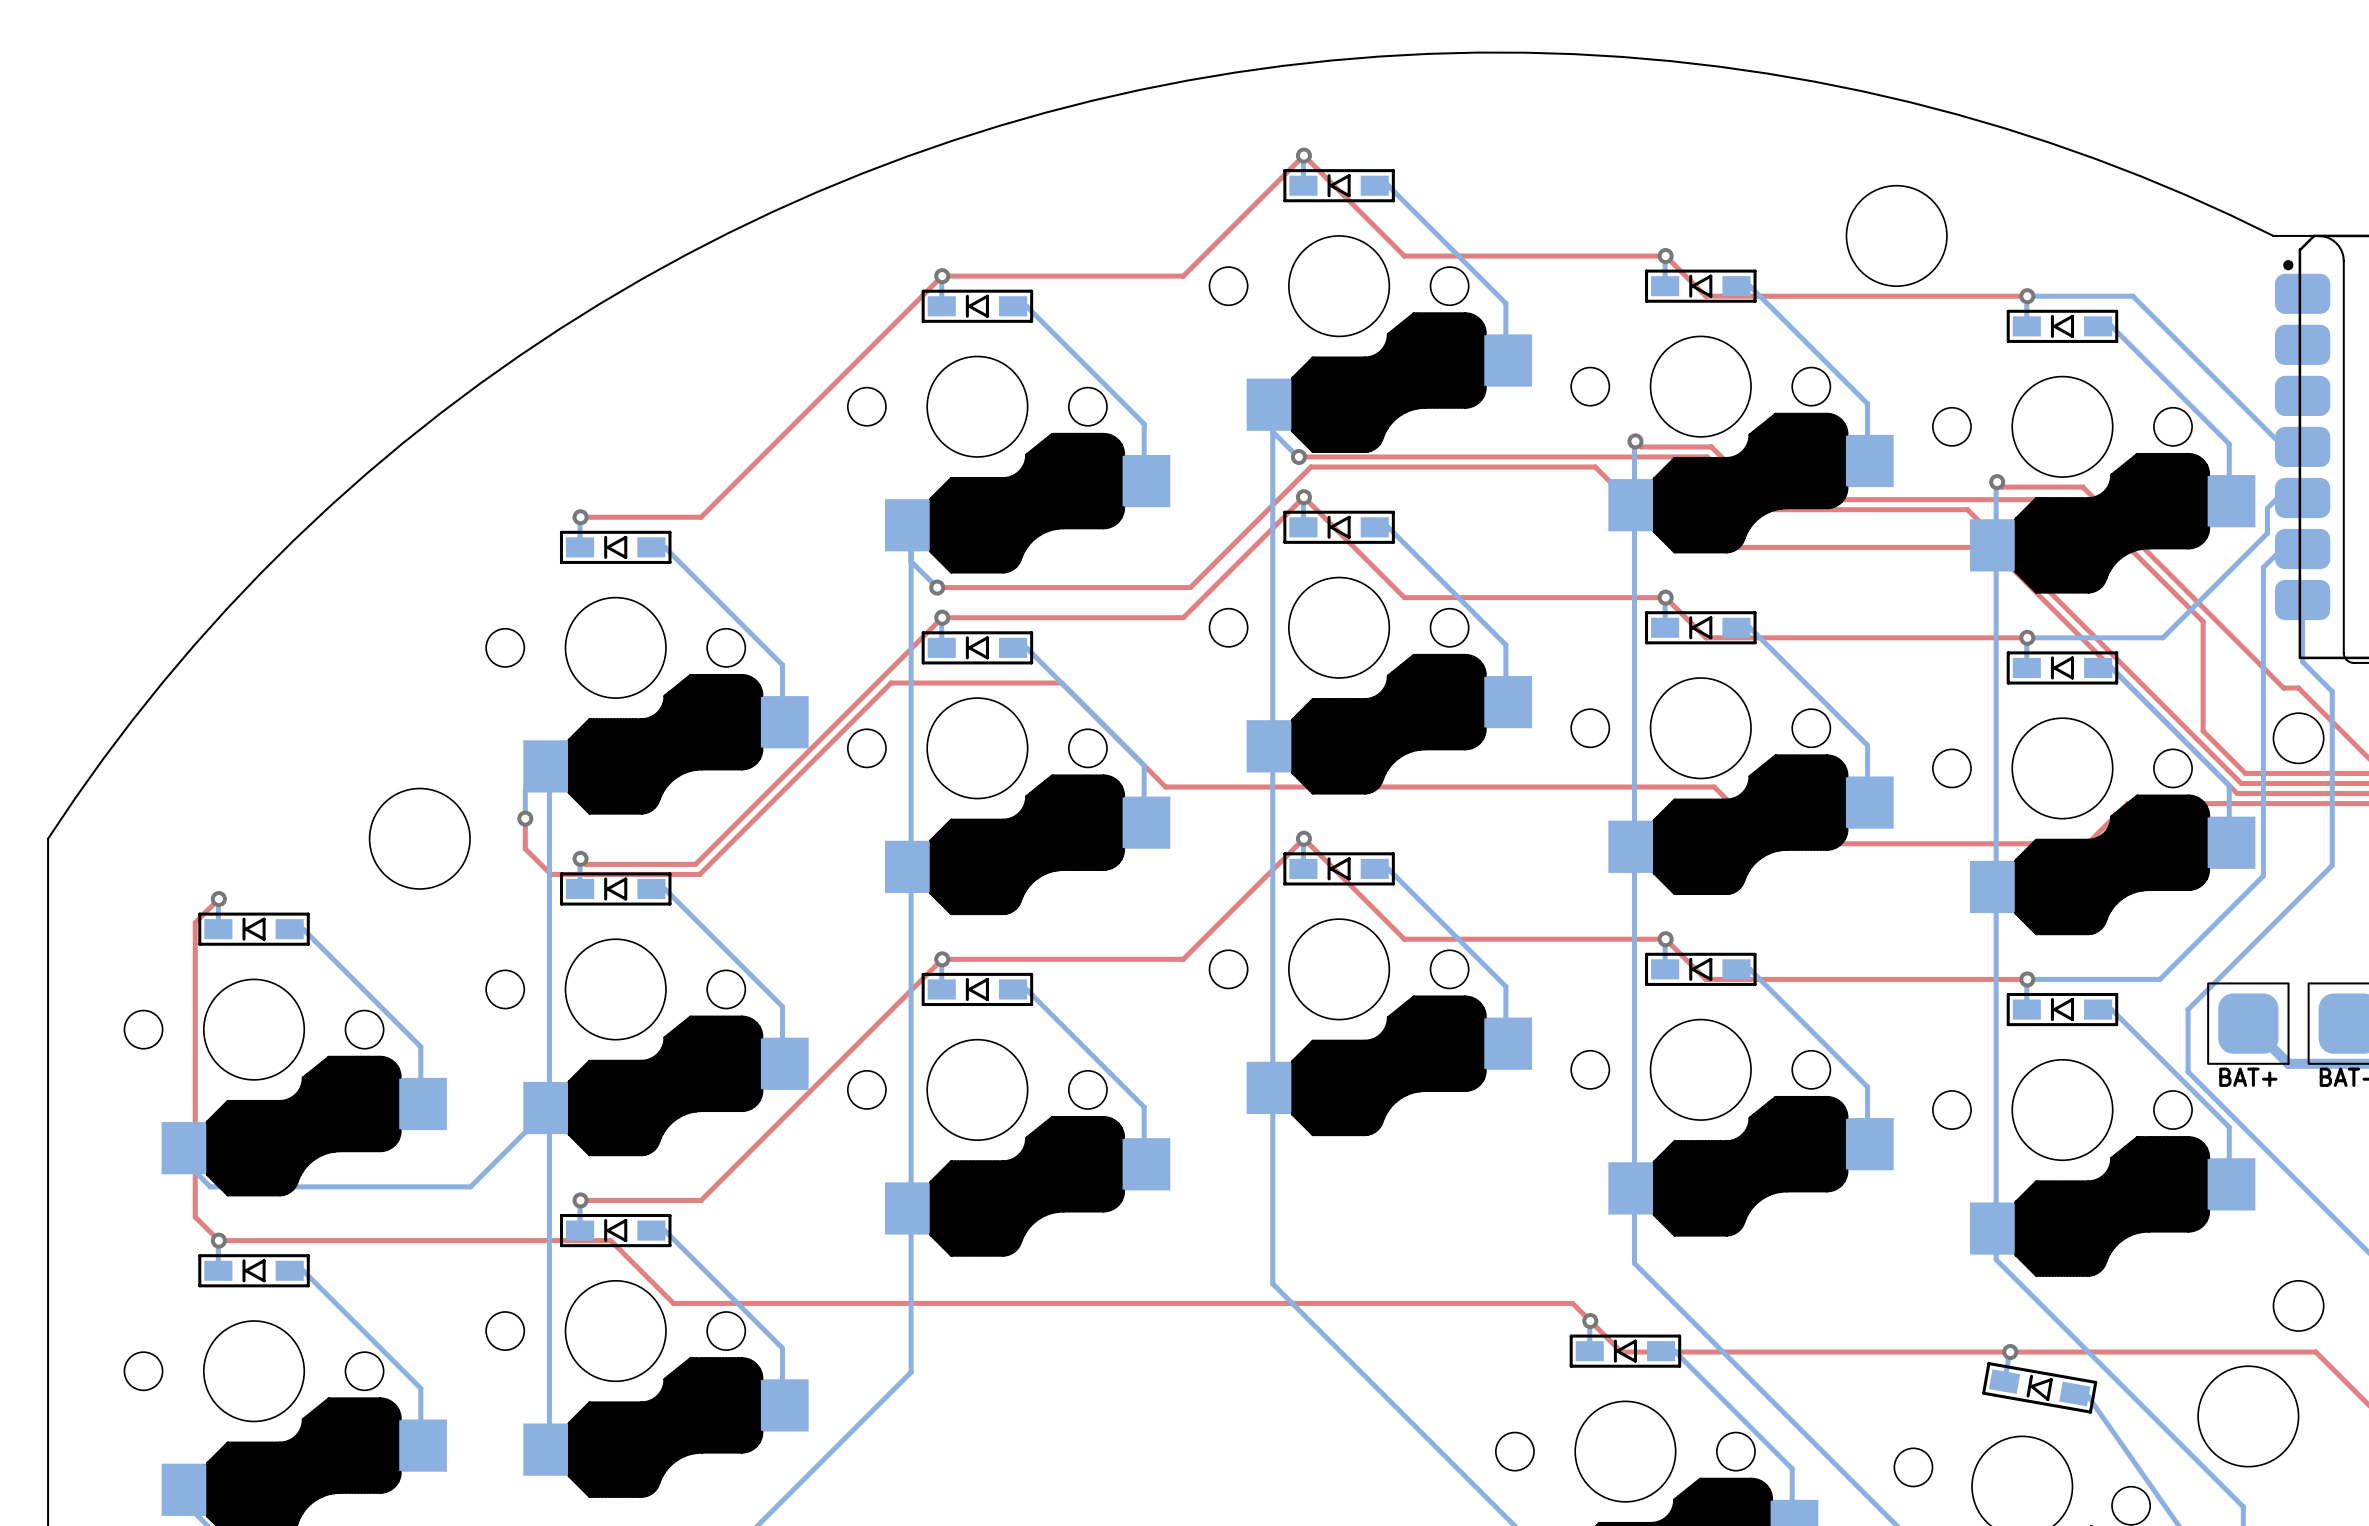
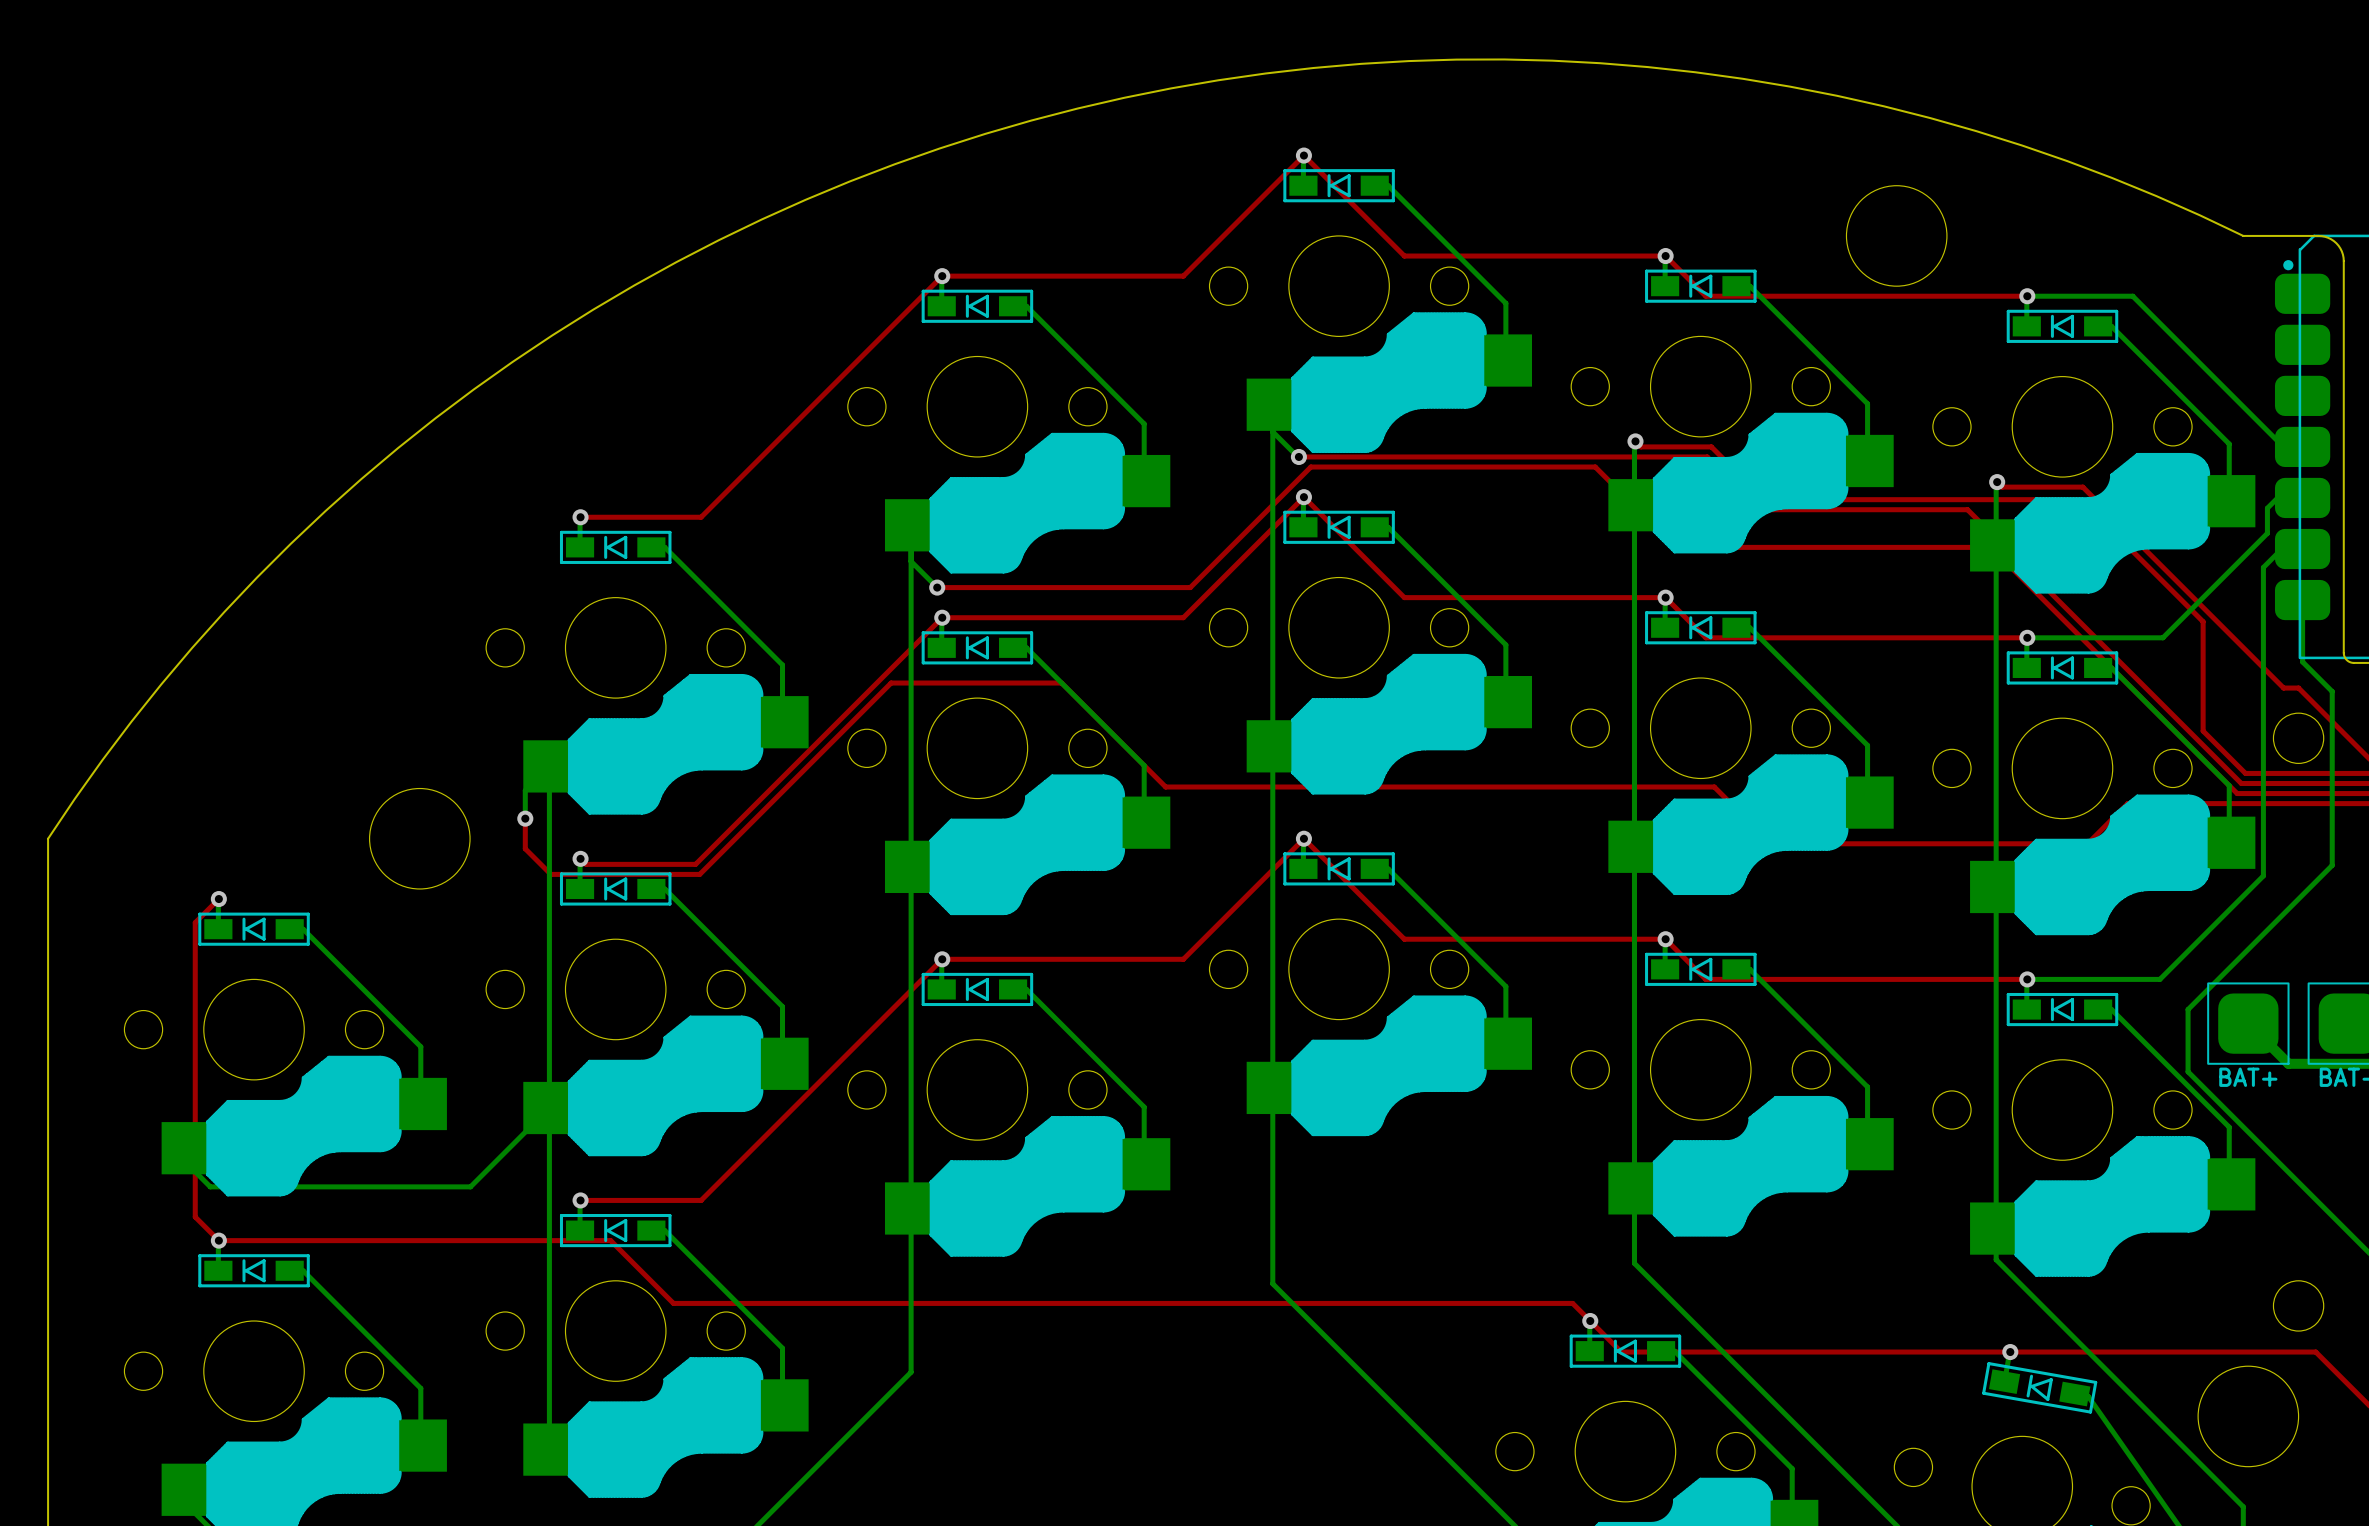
board edge: (2273, 235) (2140, 176) (2003, 127) (1862, 91) (1767, 73) (1670, 61) (1525, 52) (1428, 53) (1331, 60) (1187, 80) (1045, 112) (906, 156) (772, 212) (685, 255) (601, 303) (479, 383) (366, 474) (260, 574) (162, 682) (103, 758) (48, 838) -> (2273, 235) (2243, 235) (2111, 177) (2021, 145) (1930, 118) (1790, 86) (1647, 67) (1504, 59) (1360, 63) (1265, 73) (1171, 88) (1031, 120) (894, 164) (761, 219) (634, 285) (552, 335) (473, 389) (361, 478) (257, 577) (192, 647) (131, 721) (48, 838)

